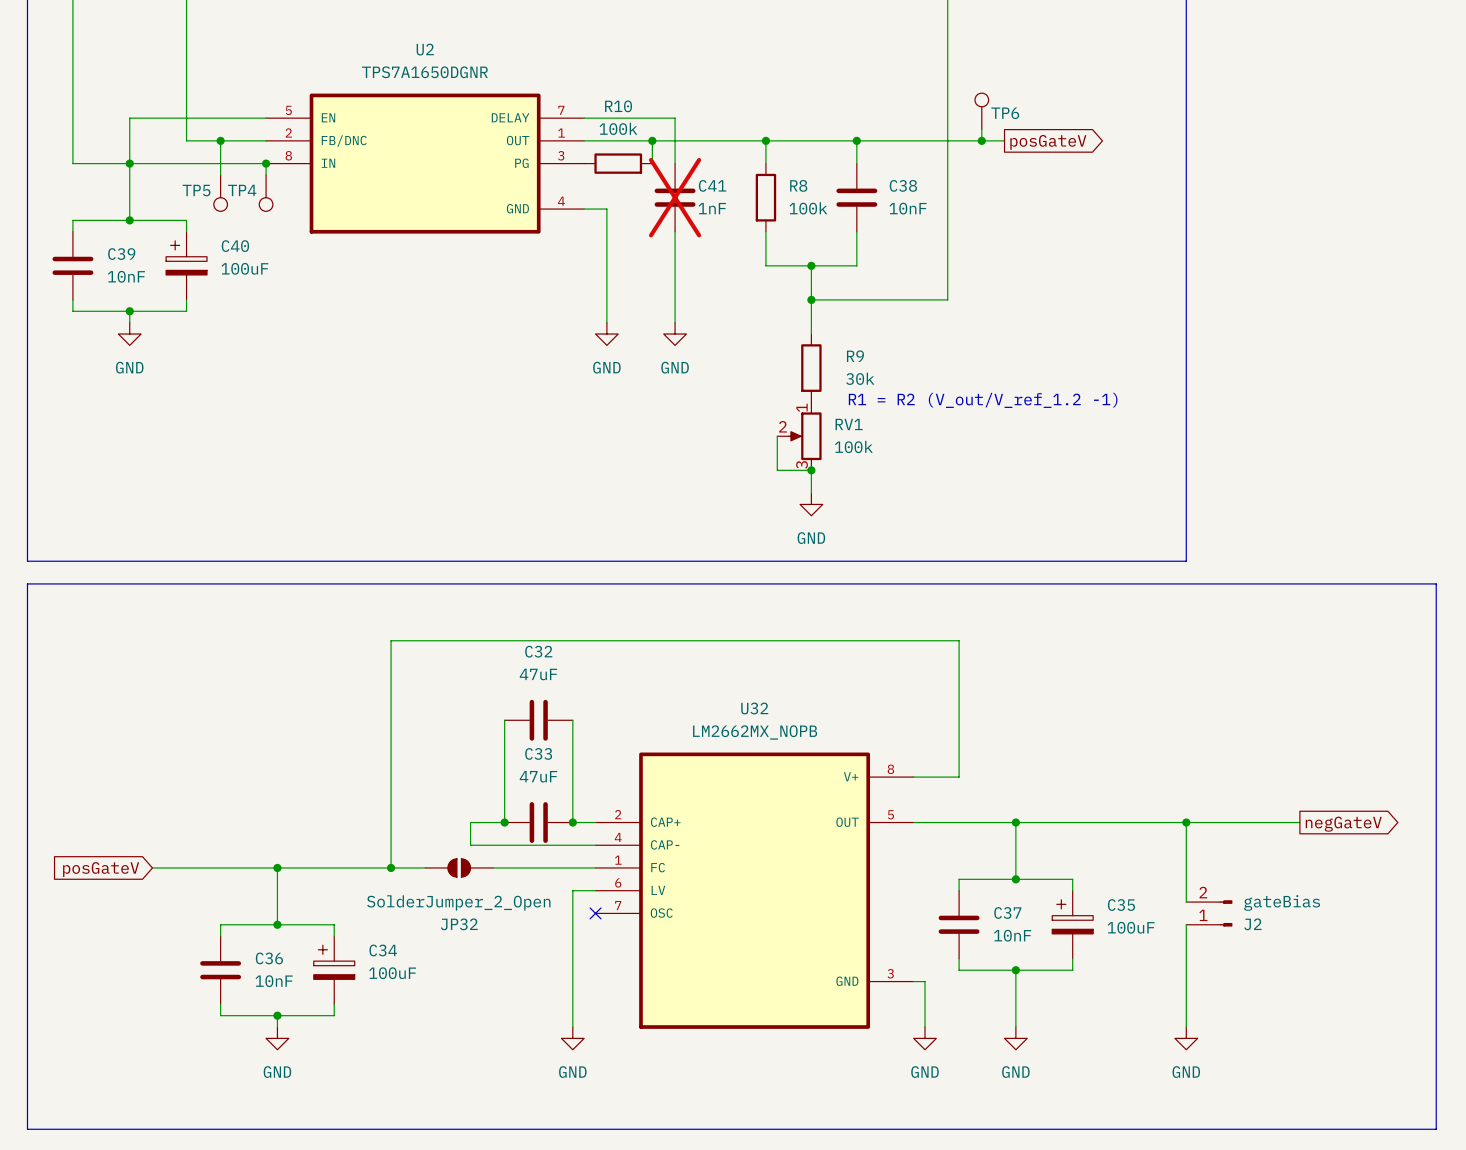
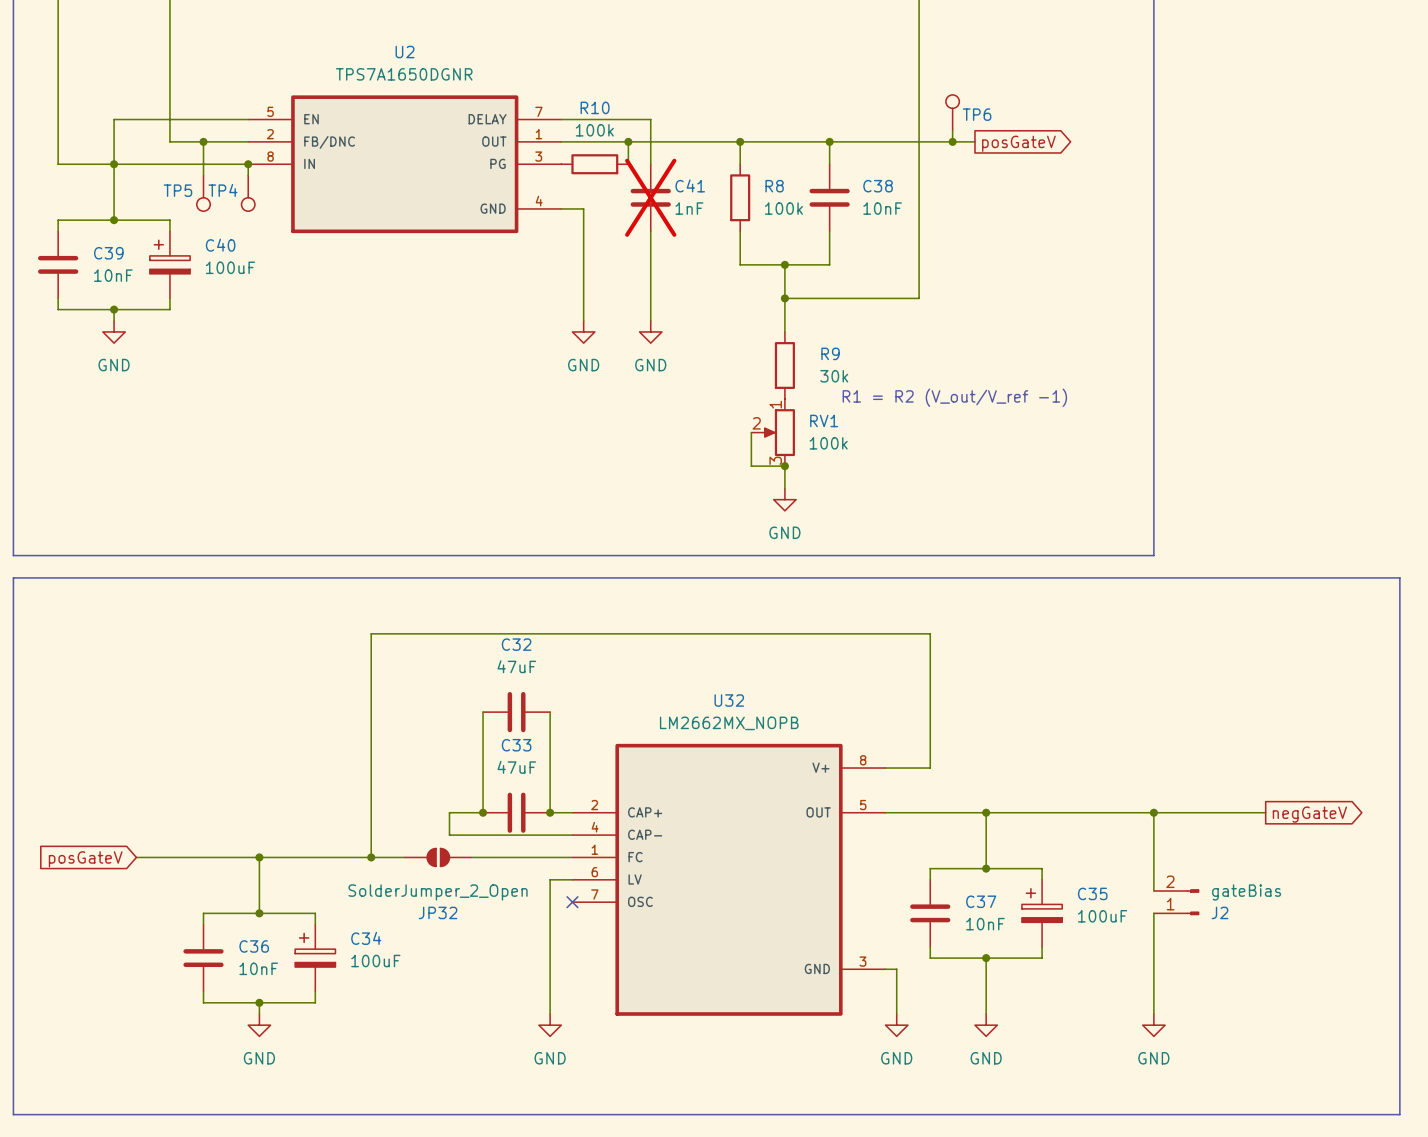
text: R1 = R2 (V_out/V_ref_1.2 -1) (983, 400) -> R1 = R2 (V_out/V_ref -1) (954, 397)

